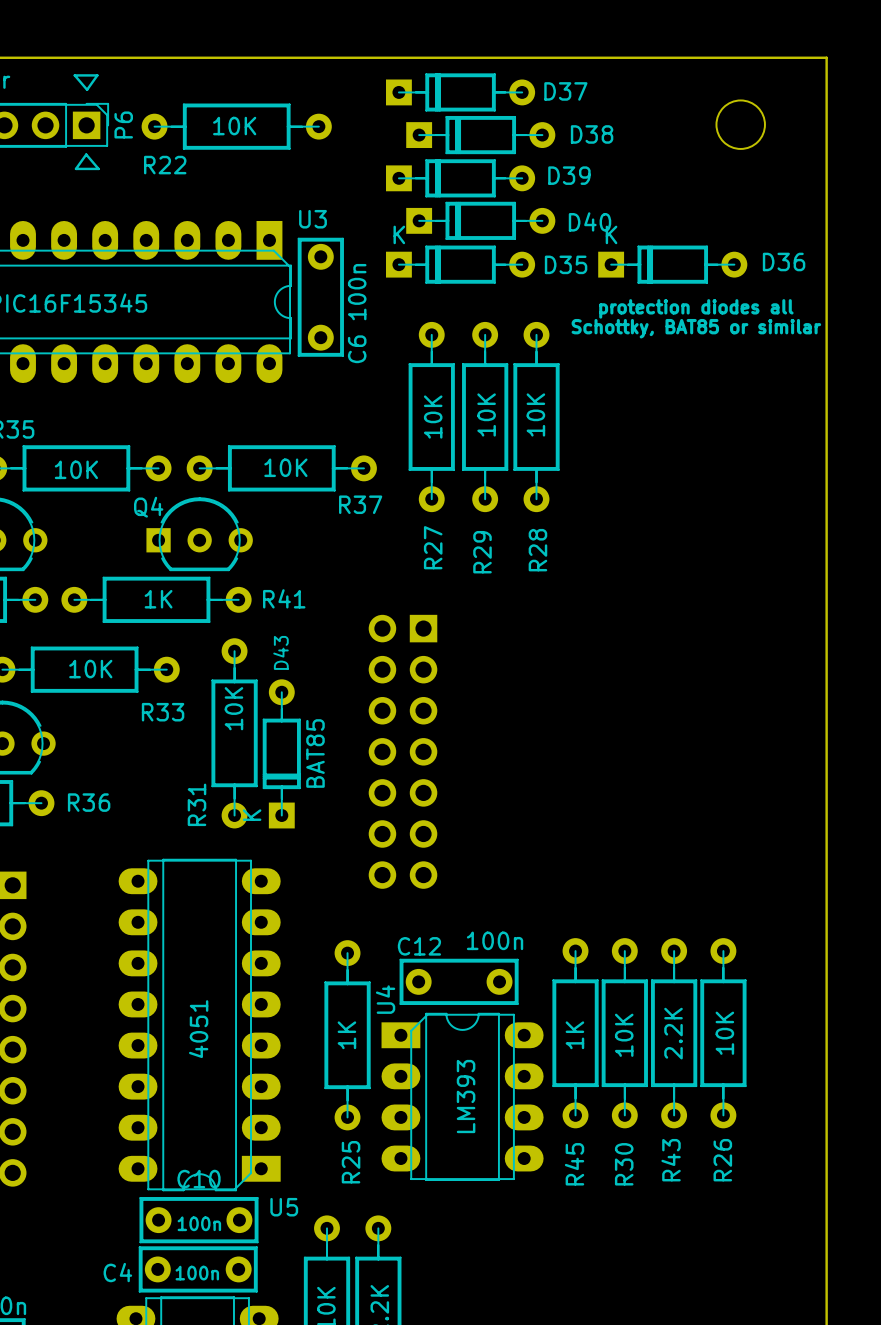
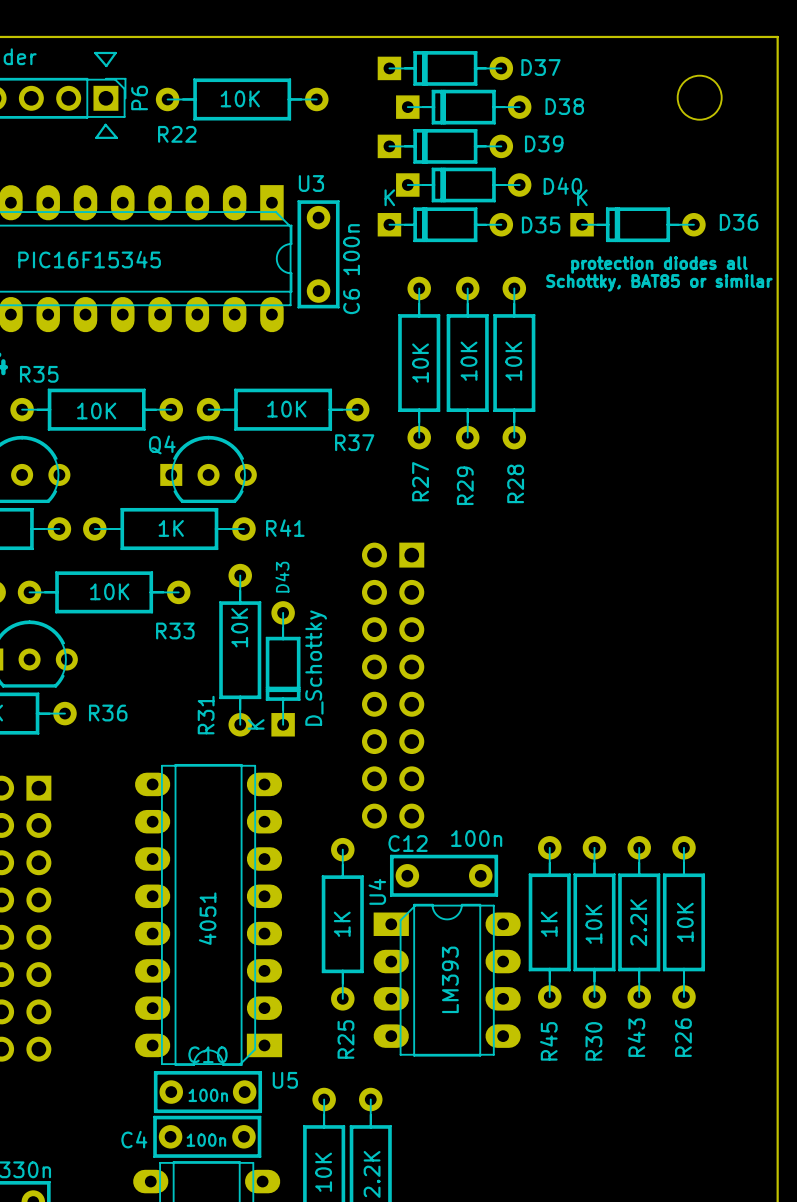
D43 value: BAT85 (315, 753) -> D_Schottky (316, 668)
part: none -> (393, 685)

